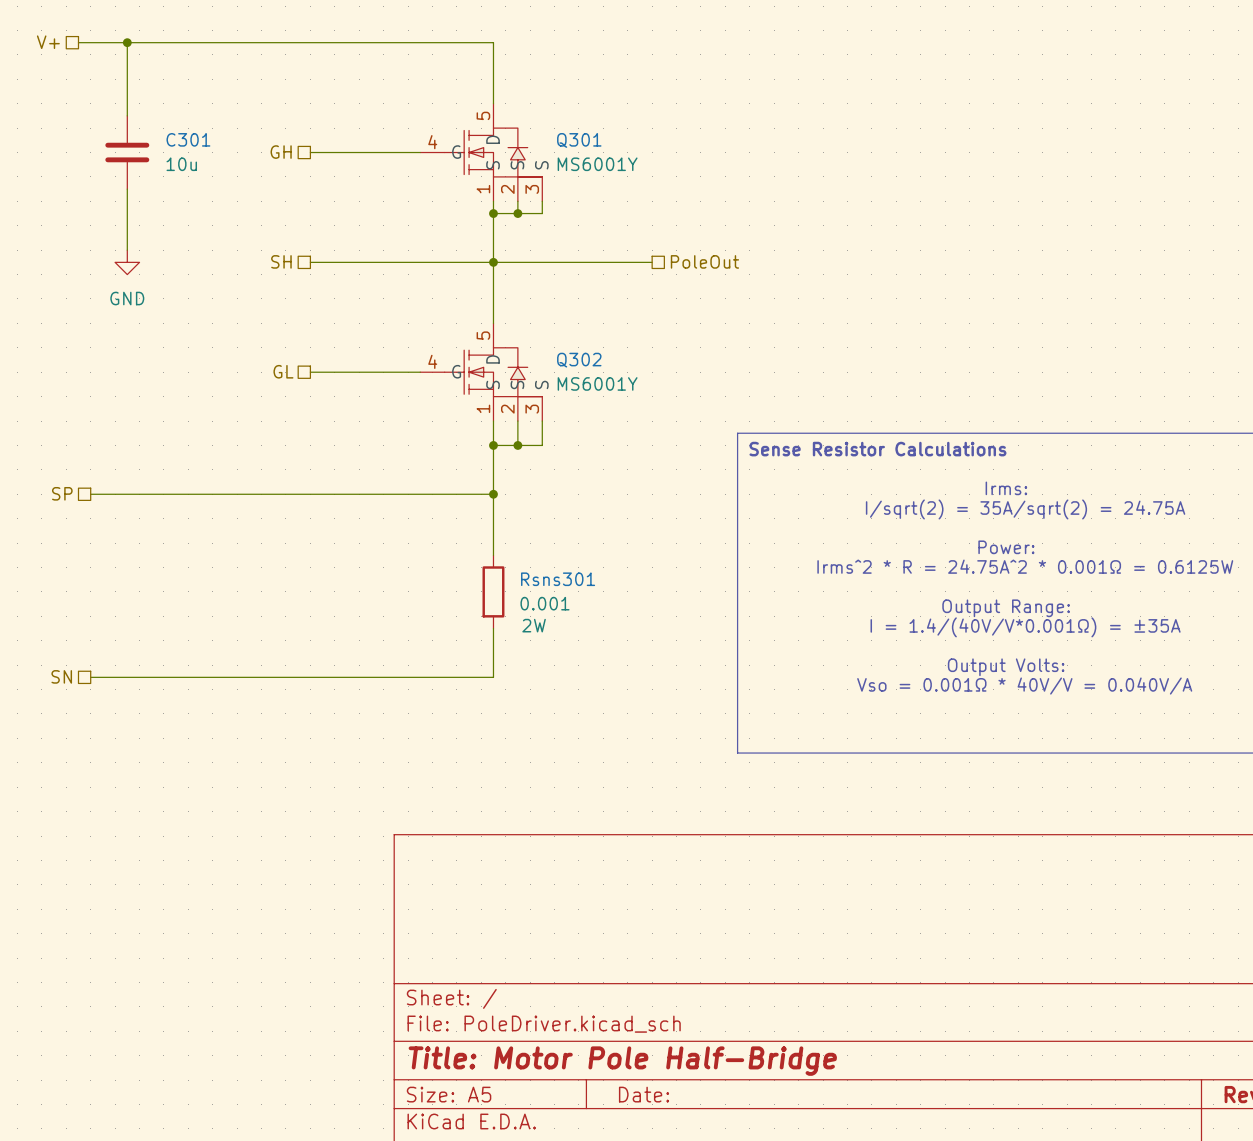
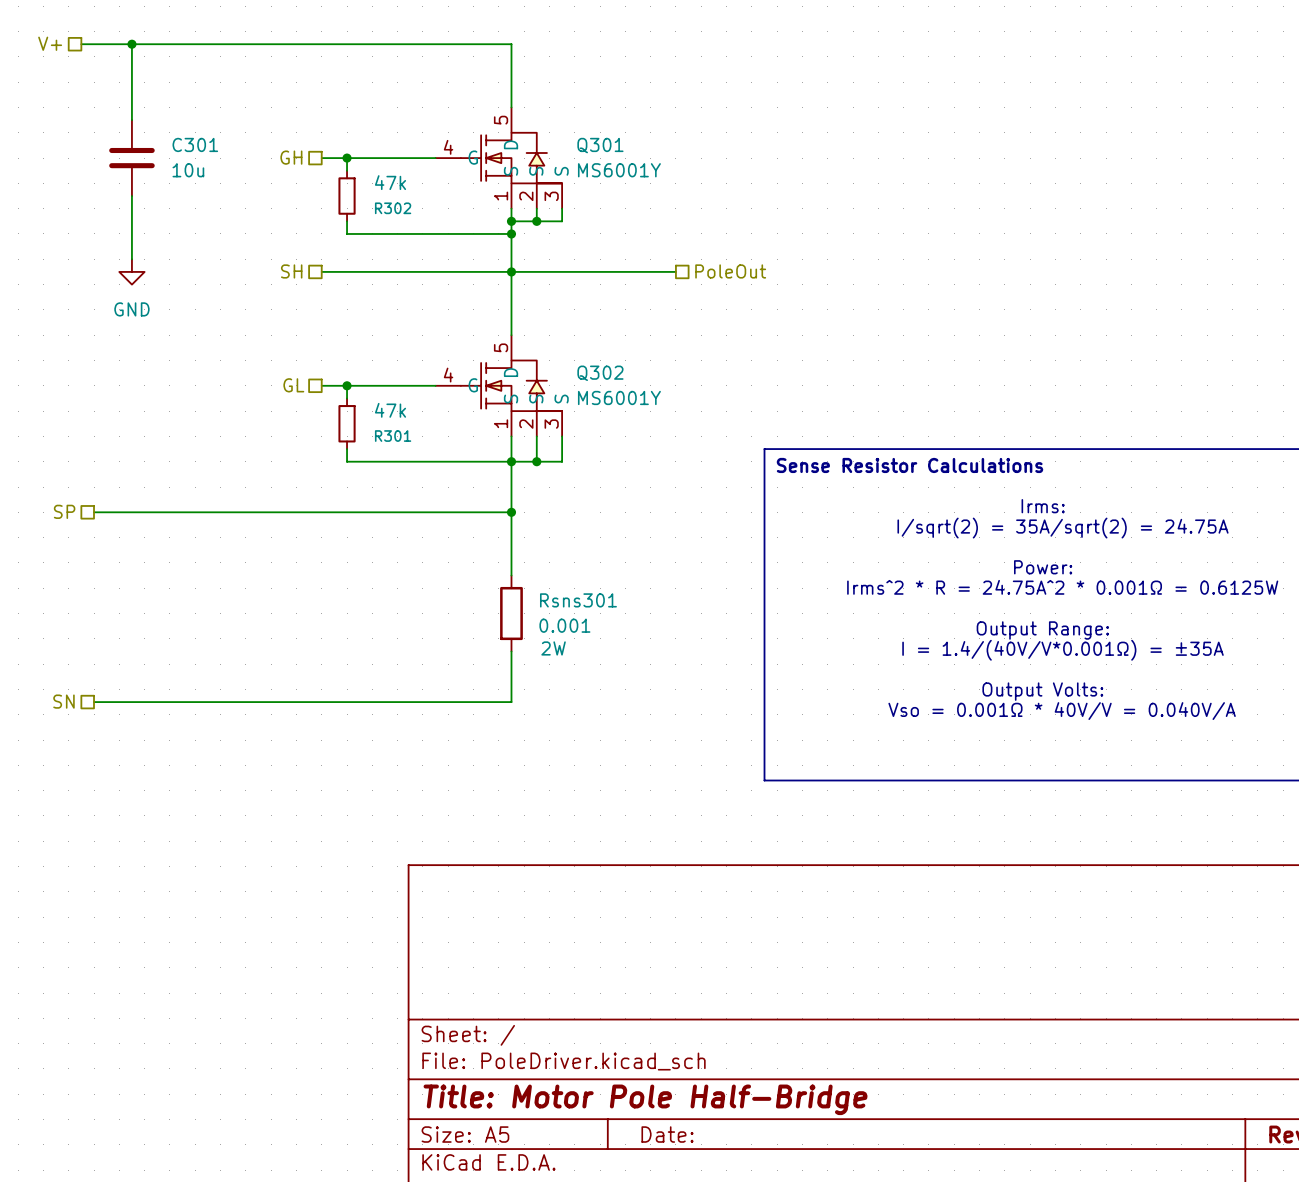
wire: none -> (347, 158) (347, 170)
junction: none -> (347, 158)
R302: none -> 47k (347, 196)
wire: none -> (347, 221) (347, 233) (511, 233)
junction: none -> (511, 233)
wire: none -> (347, 385) (347, 398)
junction: none -> (347, 385)
R301: none -> 47k (347, 423)
wire: none -> (347, 449) (347, 461) (511, 461)

